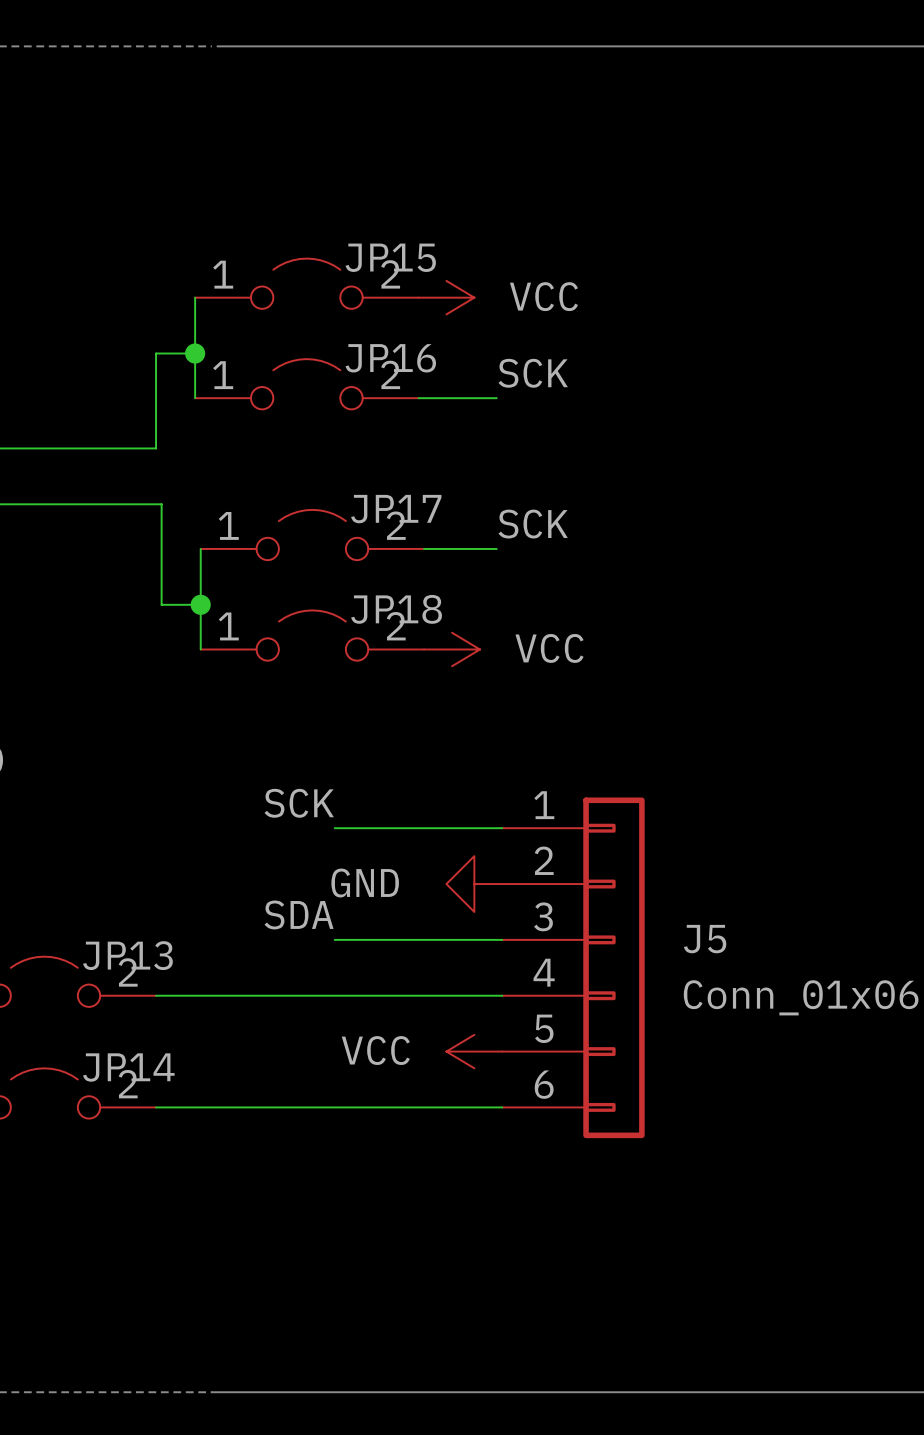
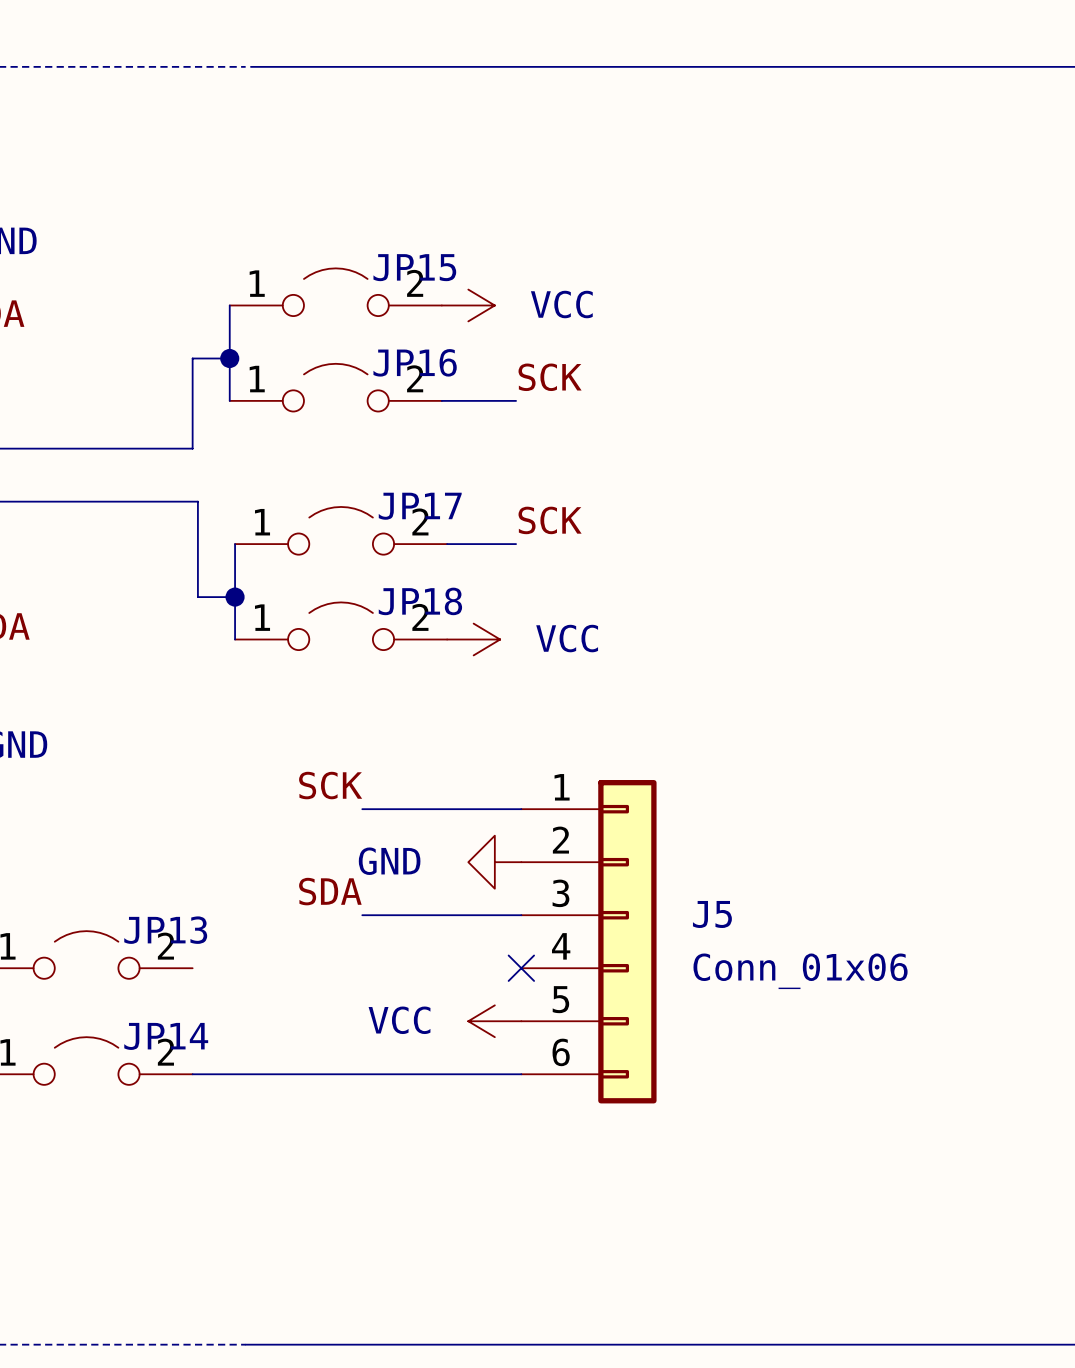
wire: (156, 995) (502, 995) -> none
no-connect mark: none -> (521, 968)

